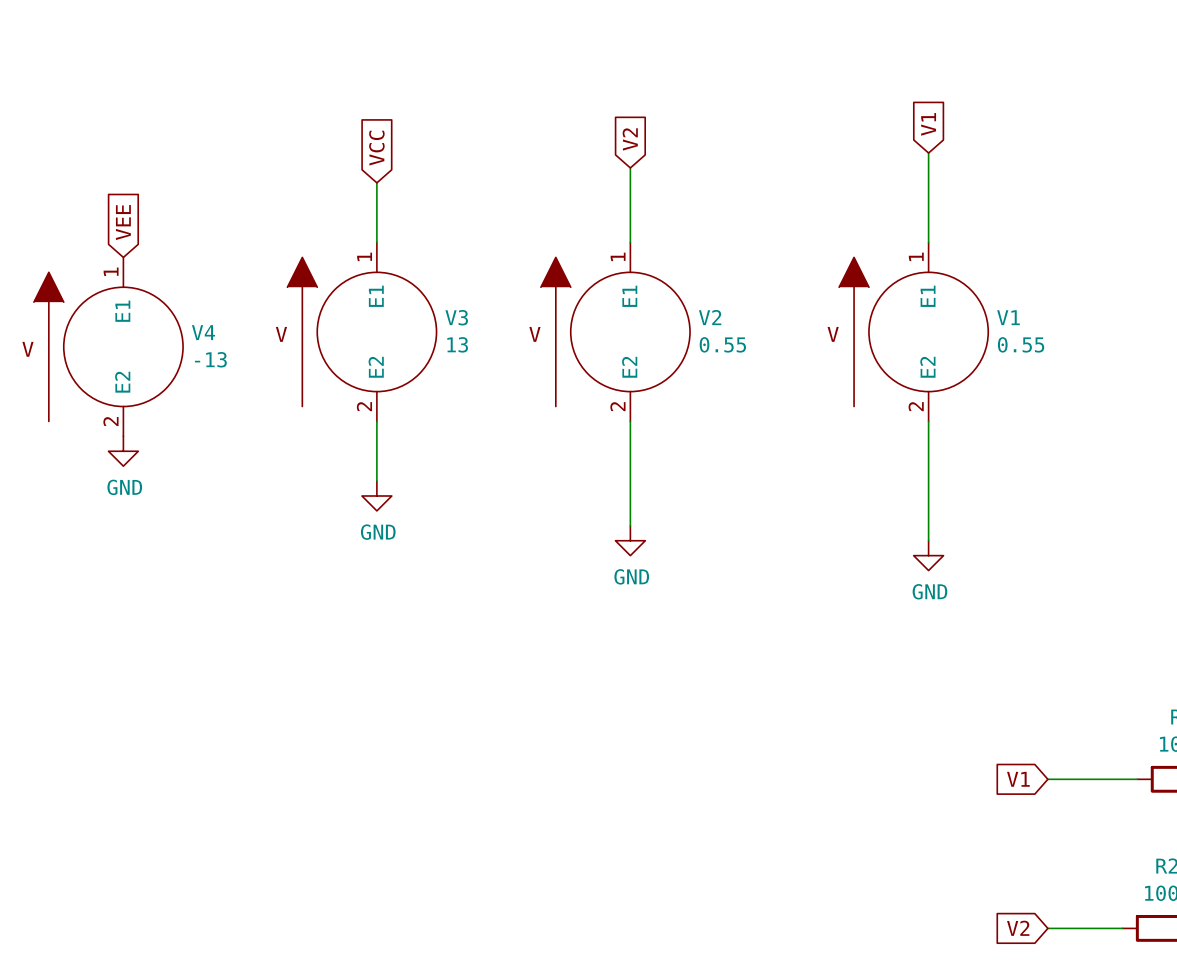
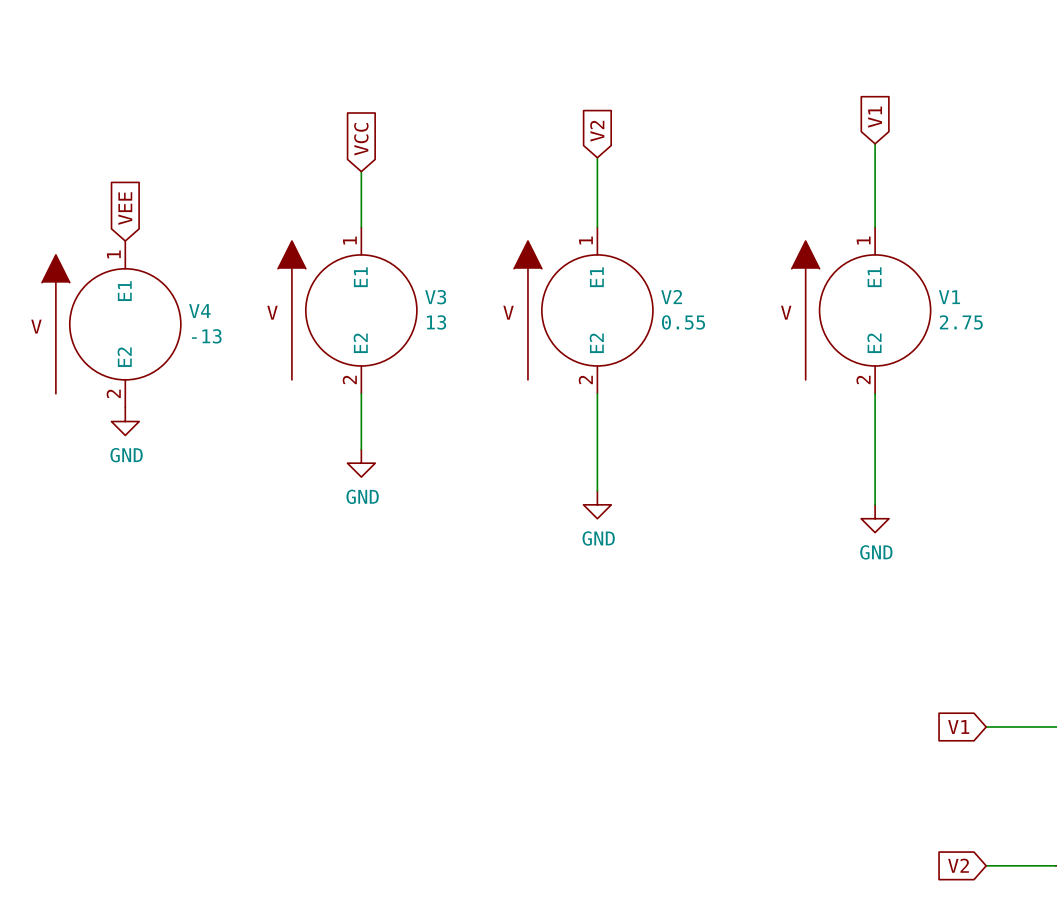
V1 value: 0.55 (1021, 344) -> 2.75 (961, 322)

